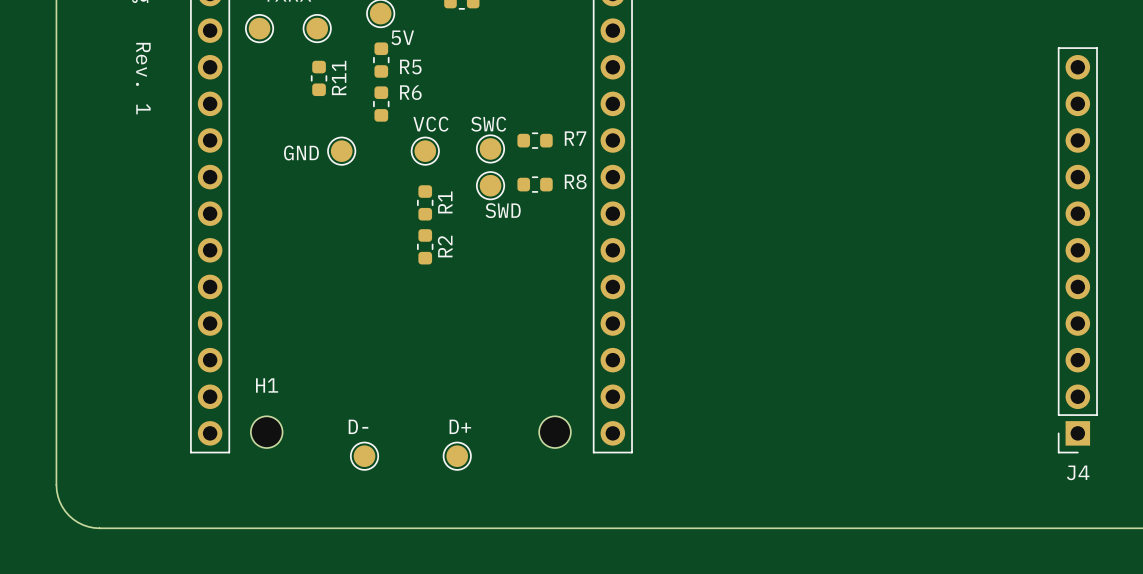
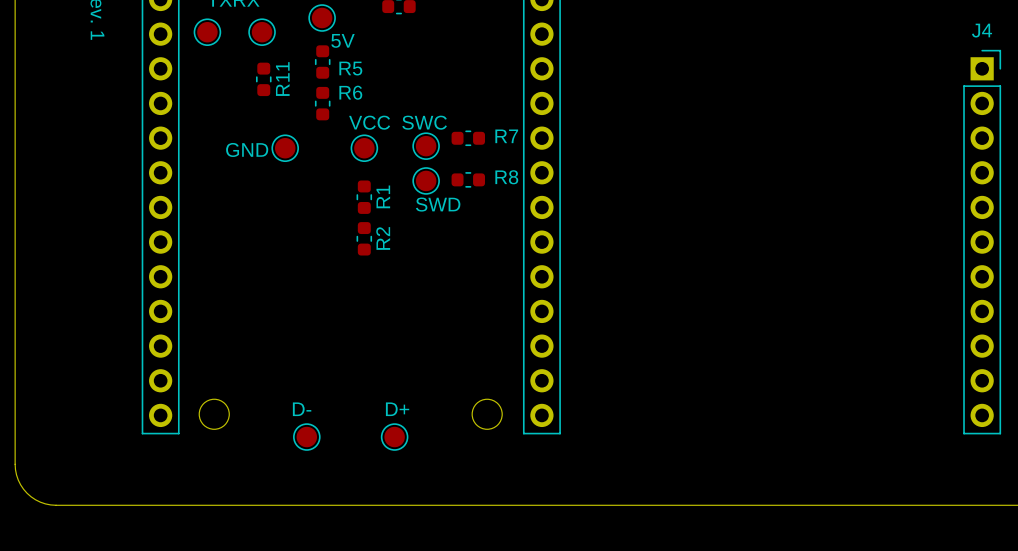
J4 rotation: 0° (1077, 250) -> 180° (982, 242)
H1 name: H1 (267, 385) -> none

